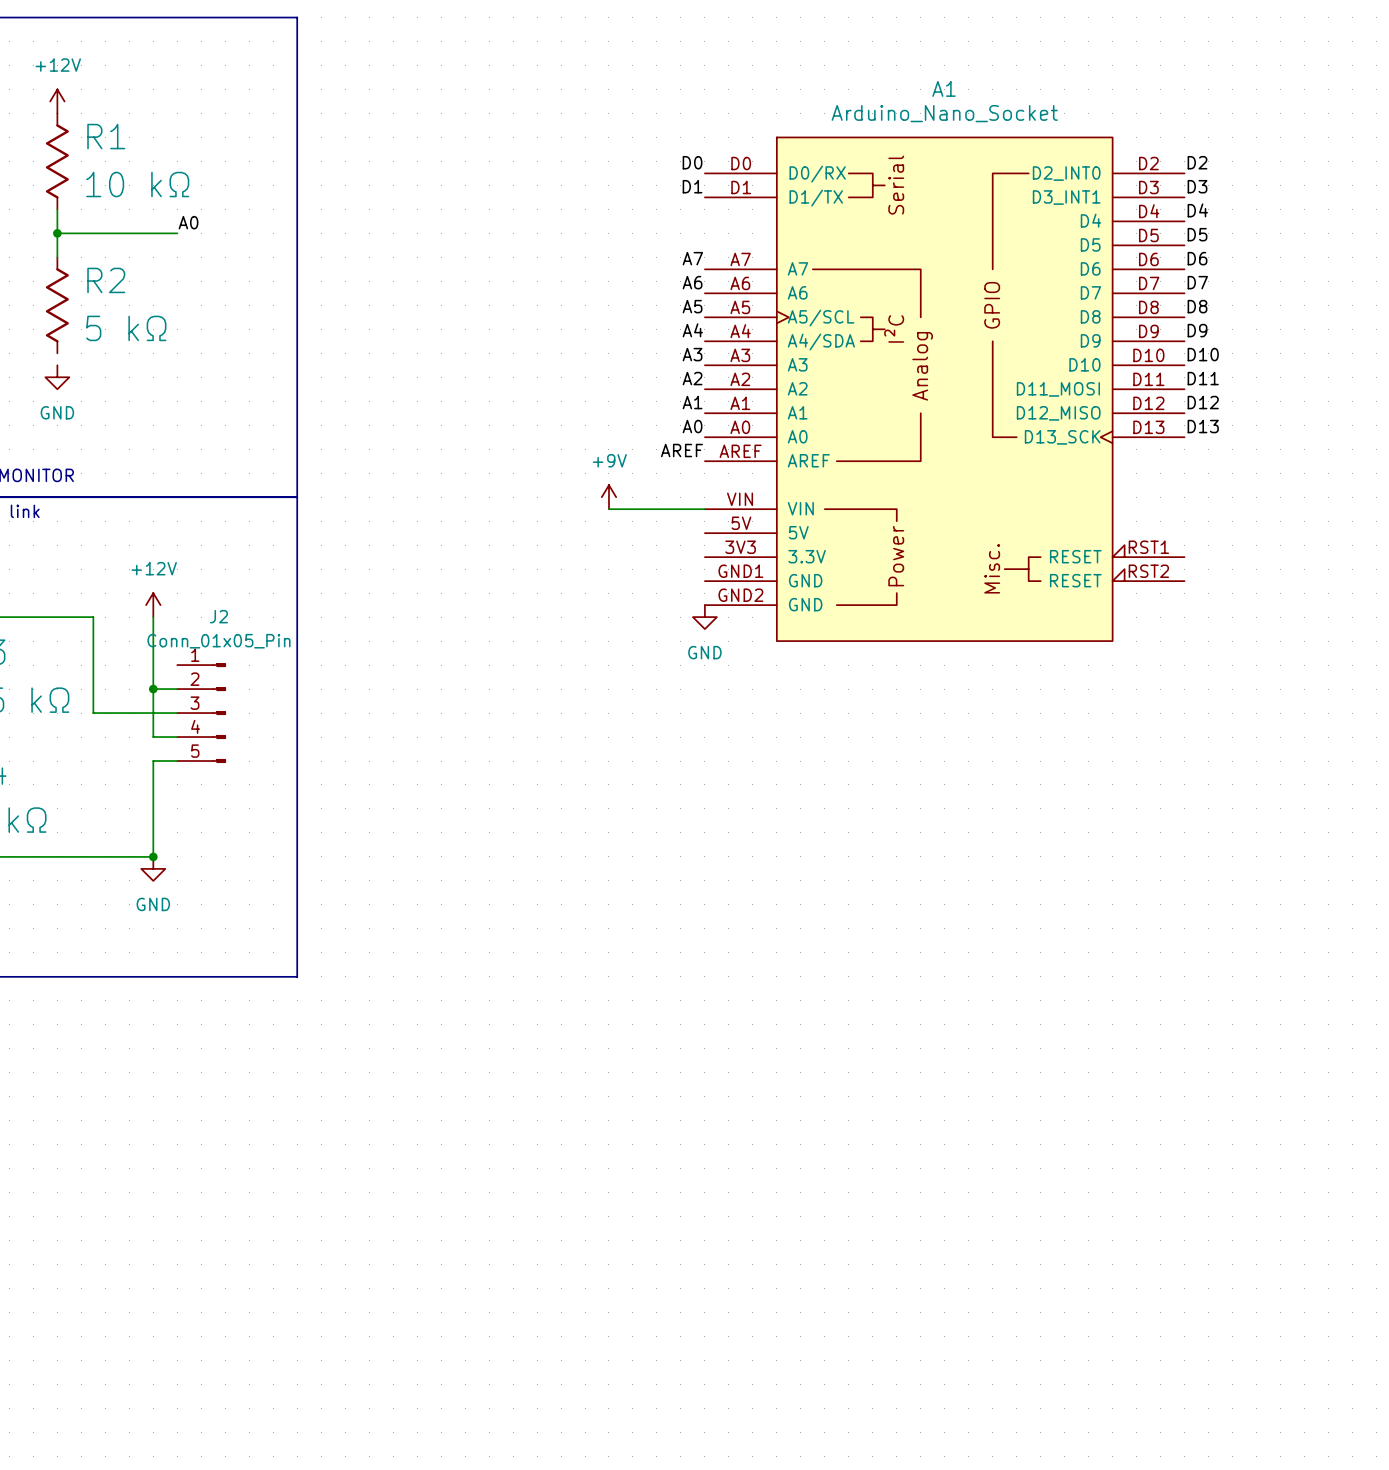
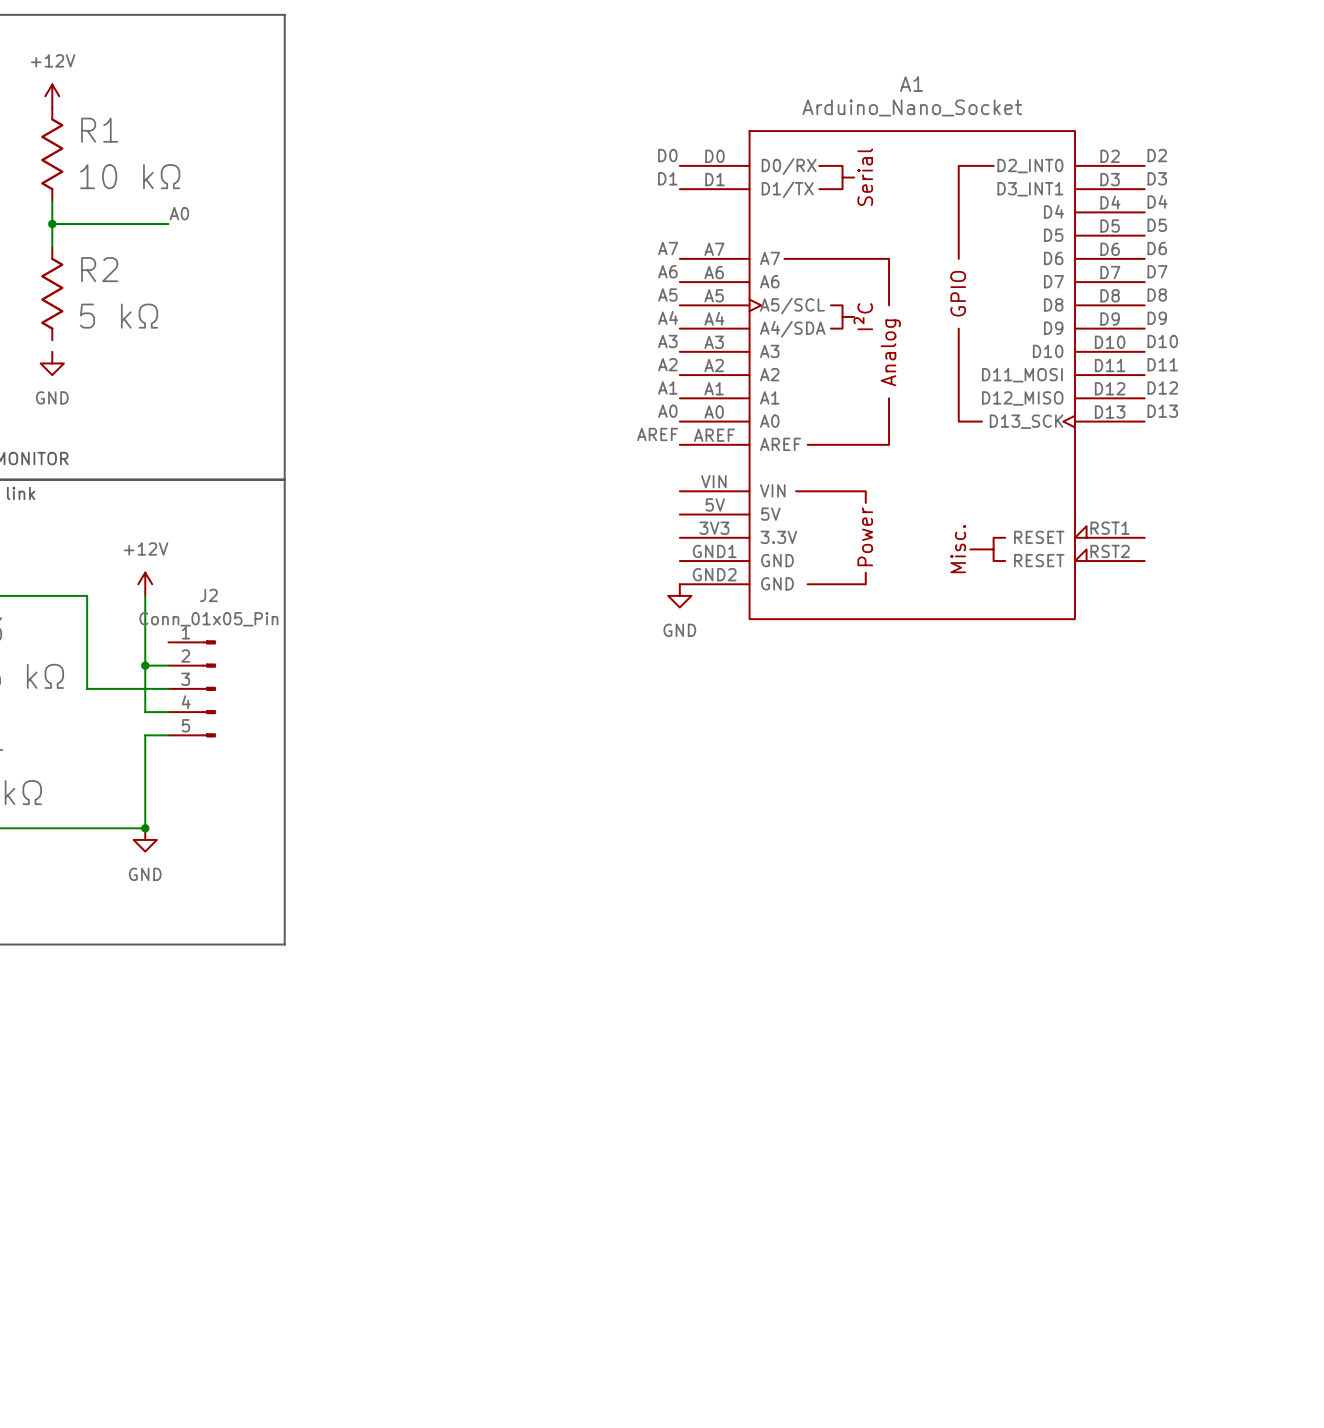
power symbol: +9V (608, 497) -> none
wire: (608, 509) (704, 509) -> none

